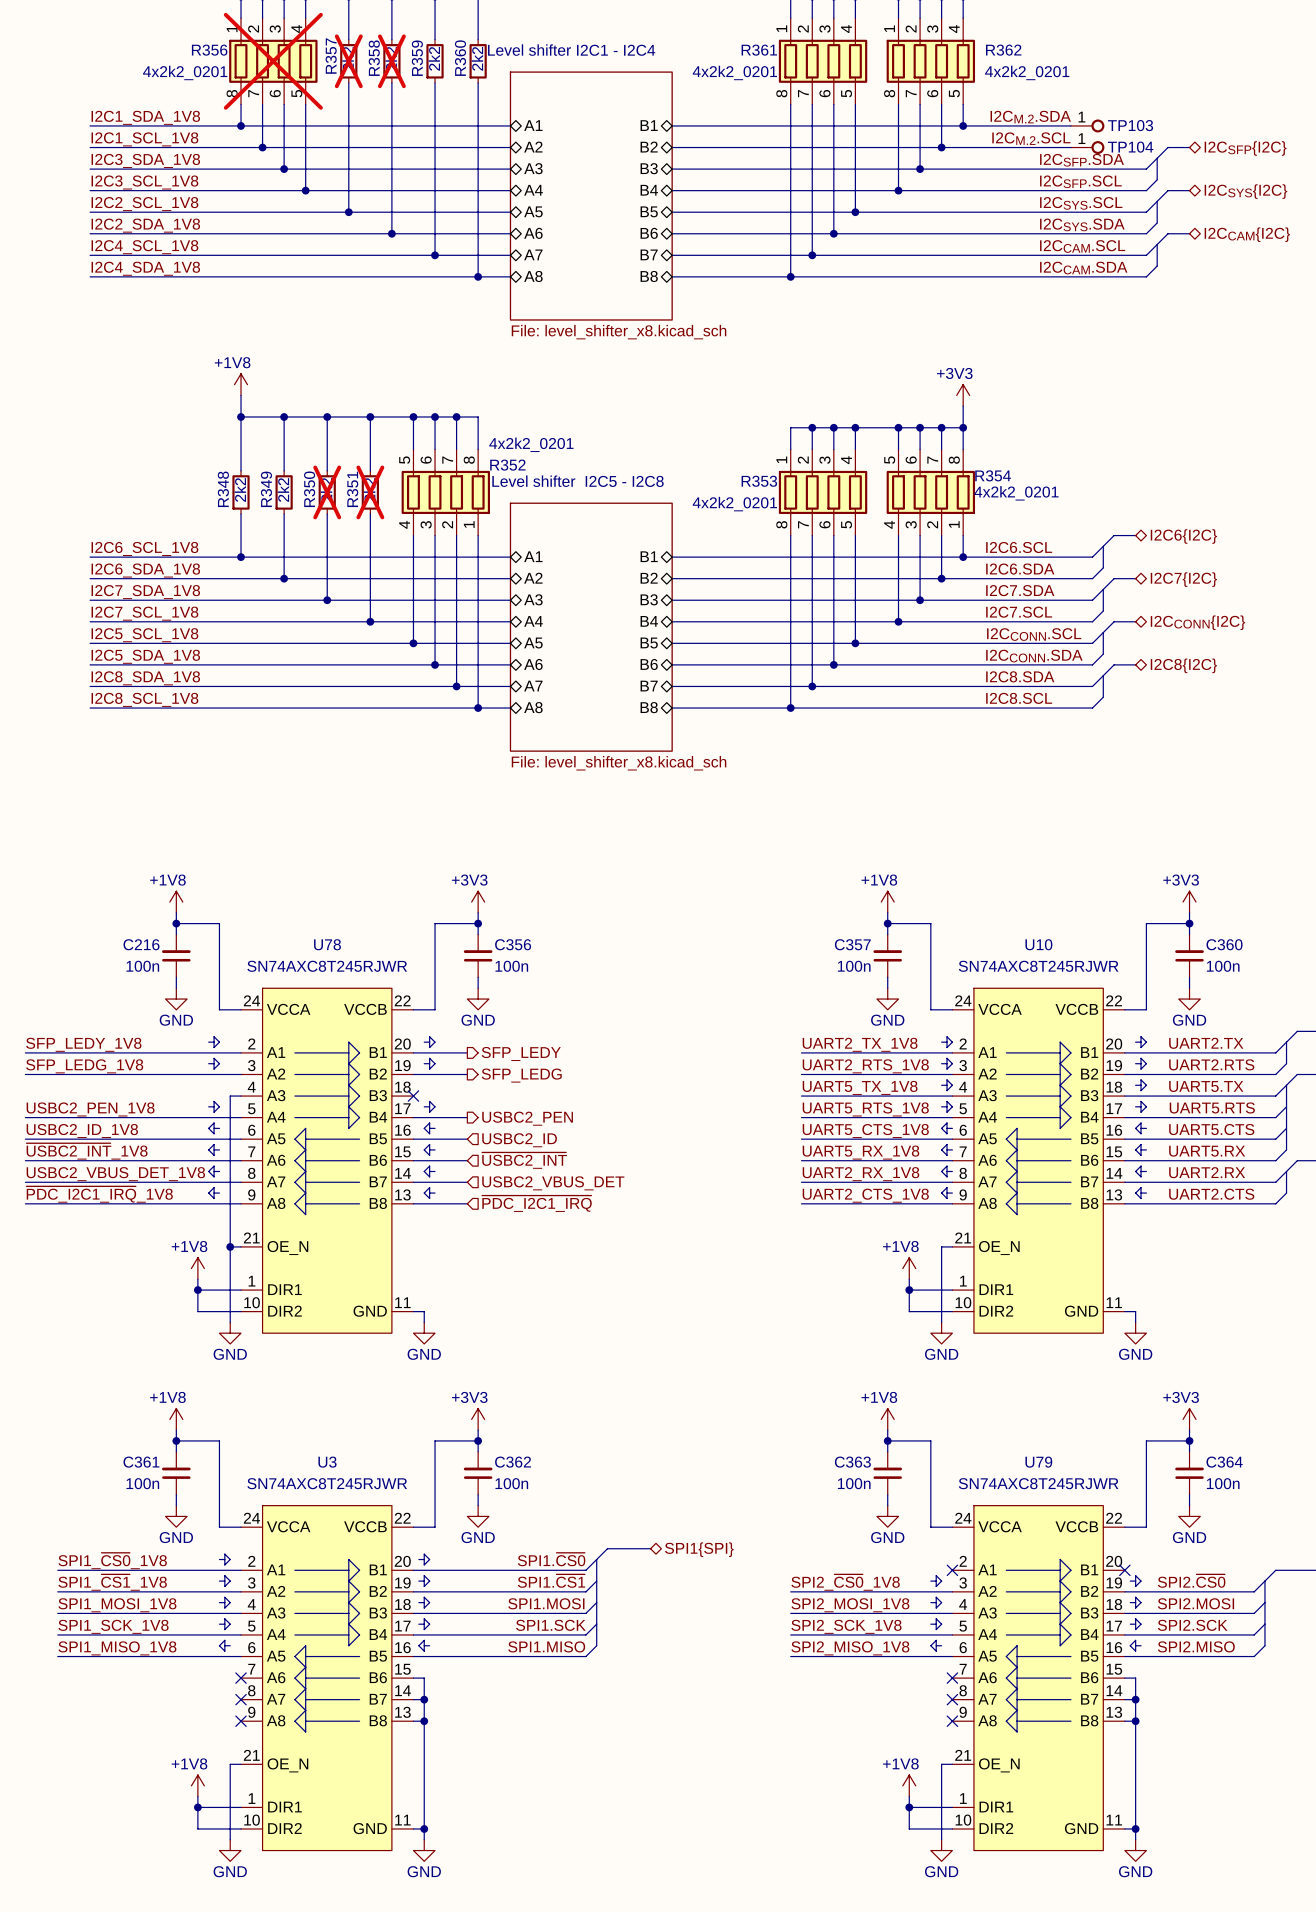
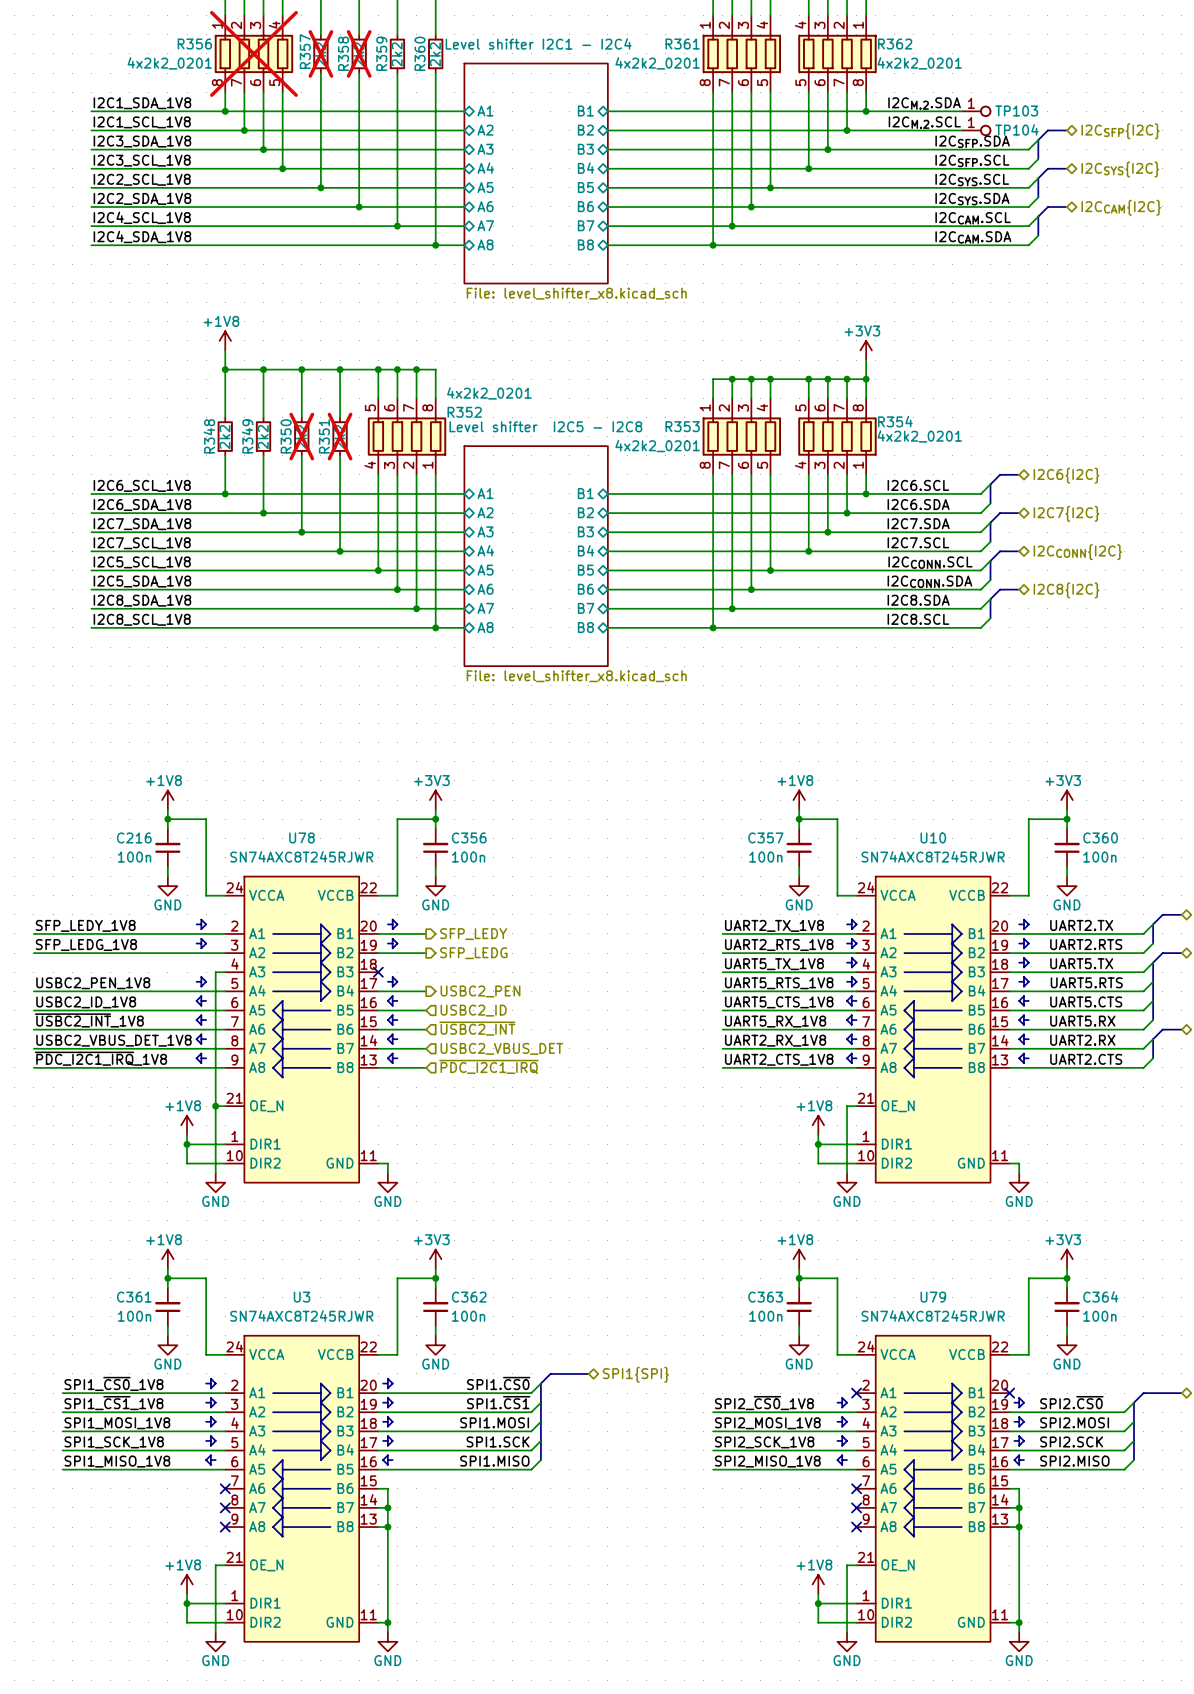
R362 flip: as is (930, 61) -> left-right (837, 53)

